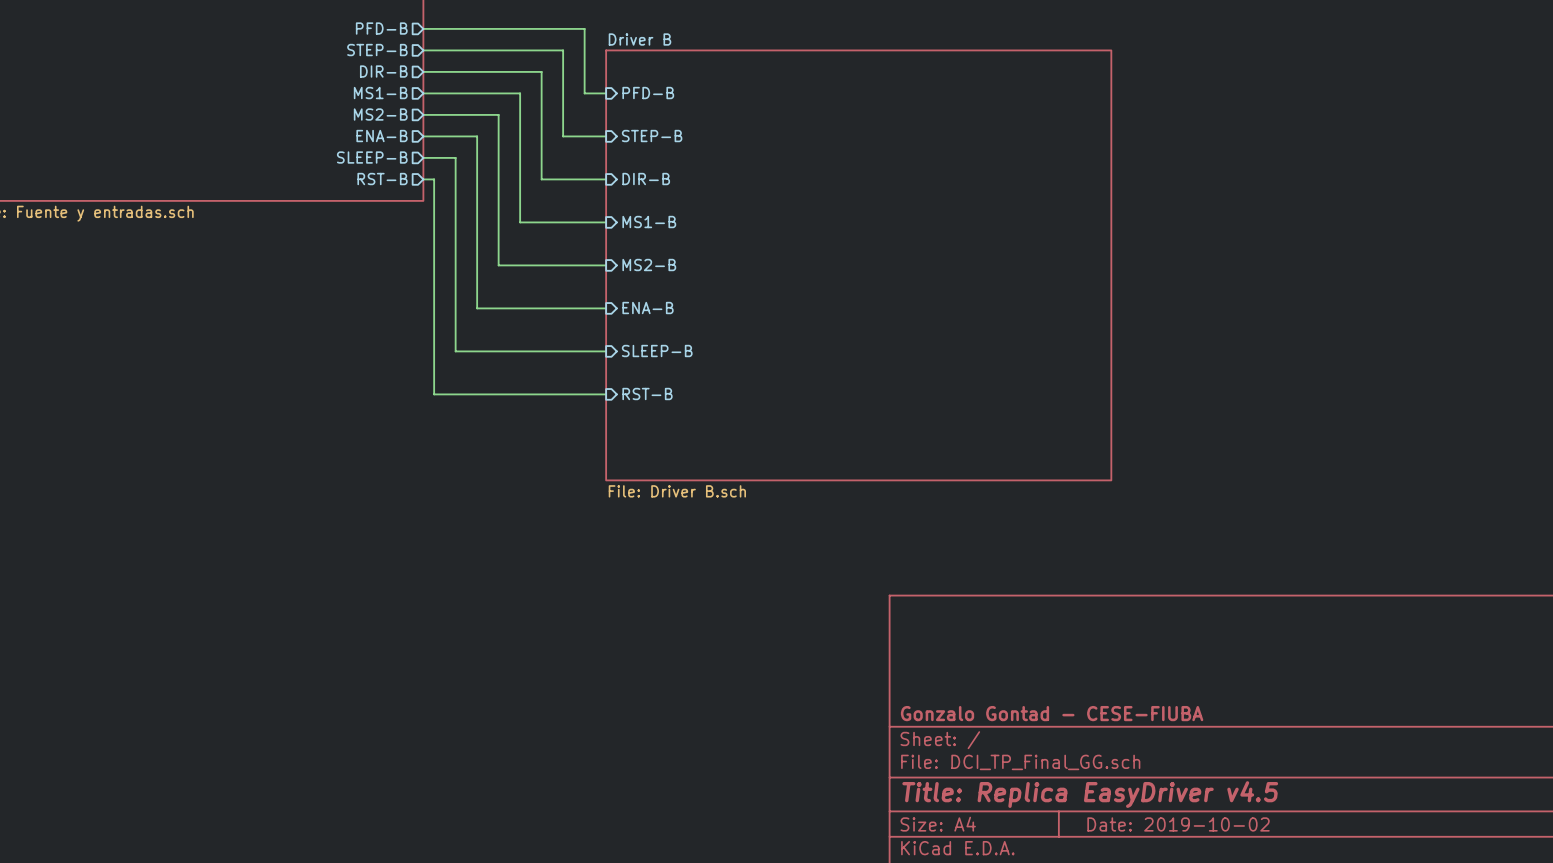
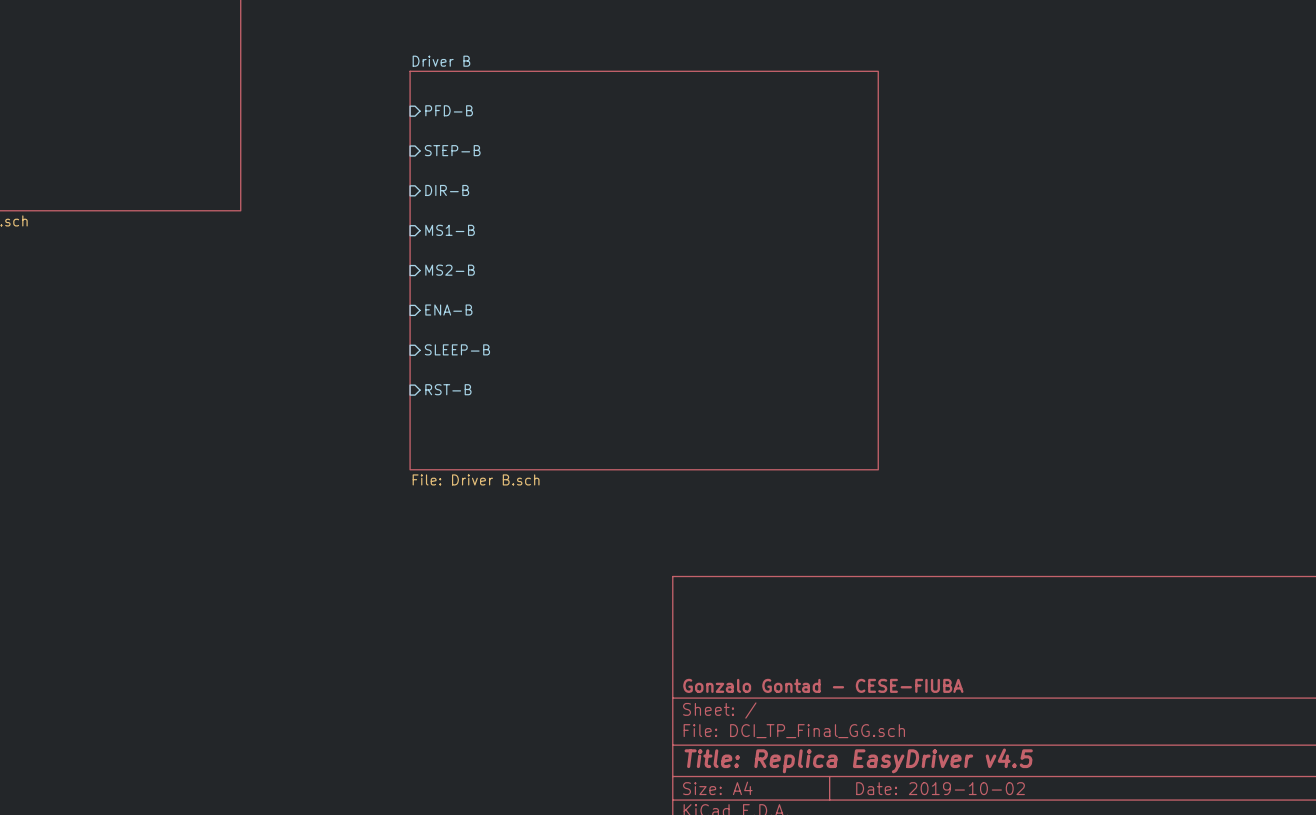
sheet pin: PFD-B (381, 28) -> none
wire: (423, 28) (584, 28) (584, 93) (606, 93) -> none
sheet pin: STEP-B (377, 50) -> none
wire: (423, 50) (563, 50) (563, 136) (606, 136) -> none
sheet pin: DIR-B (383, 71) -> none
wire: (423, 71) (541, 71) (541, 179) (606, 179) -> none
sheet pin: MS1-B (380, 93) -> none
wire: (423, 93) (520, 93) (520, 222) (606, 222) -> none
sheet pin: MS2-B (380, 114) -> none
wire: (423, 114) (498, 114) (498, 265) (606, 265) -> none
sheet pin: ENA-B (382, 136) -> none
wire: (423, 136) (477, 136) (477, 308) (606, 308) -> none
sheet pin: SLEEP-B (372, 157) -> none
wire: (423, 157) (455, 157) (455, 351) (606, 351) -> none
sheet pin: RST-B (382, 179) -> none
wire: (423, 179) (434, 179) (434, 394) (606, 394) -> none

